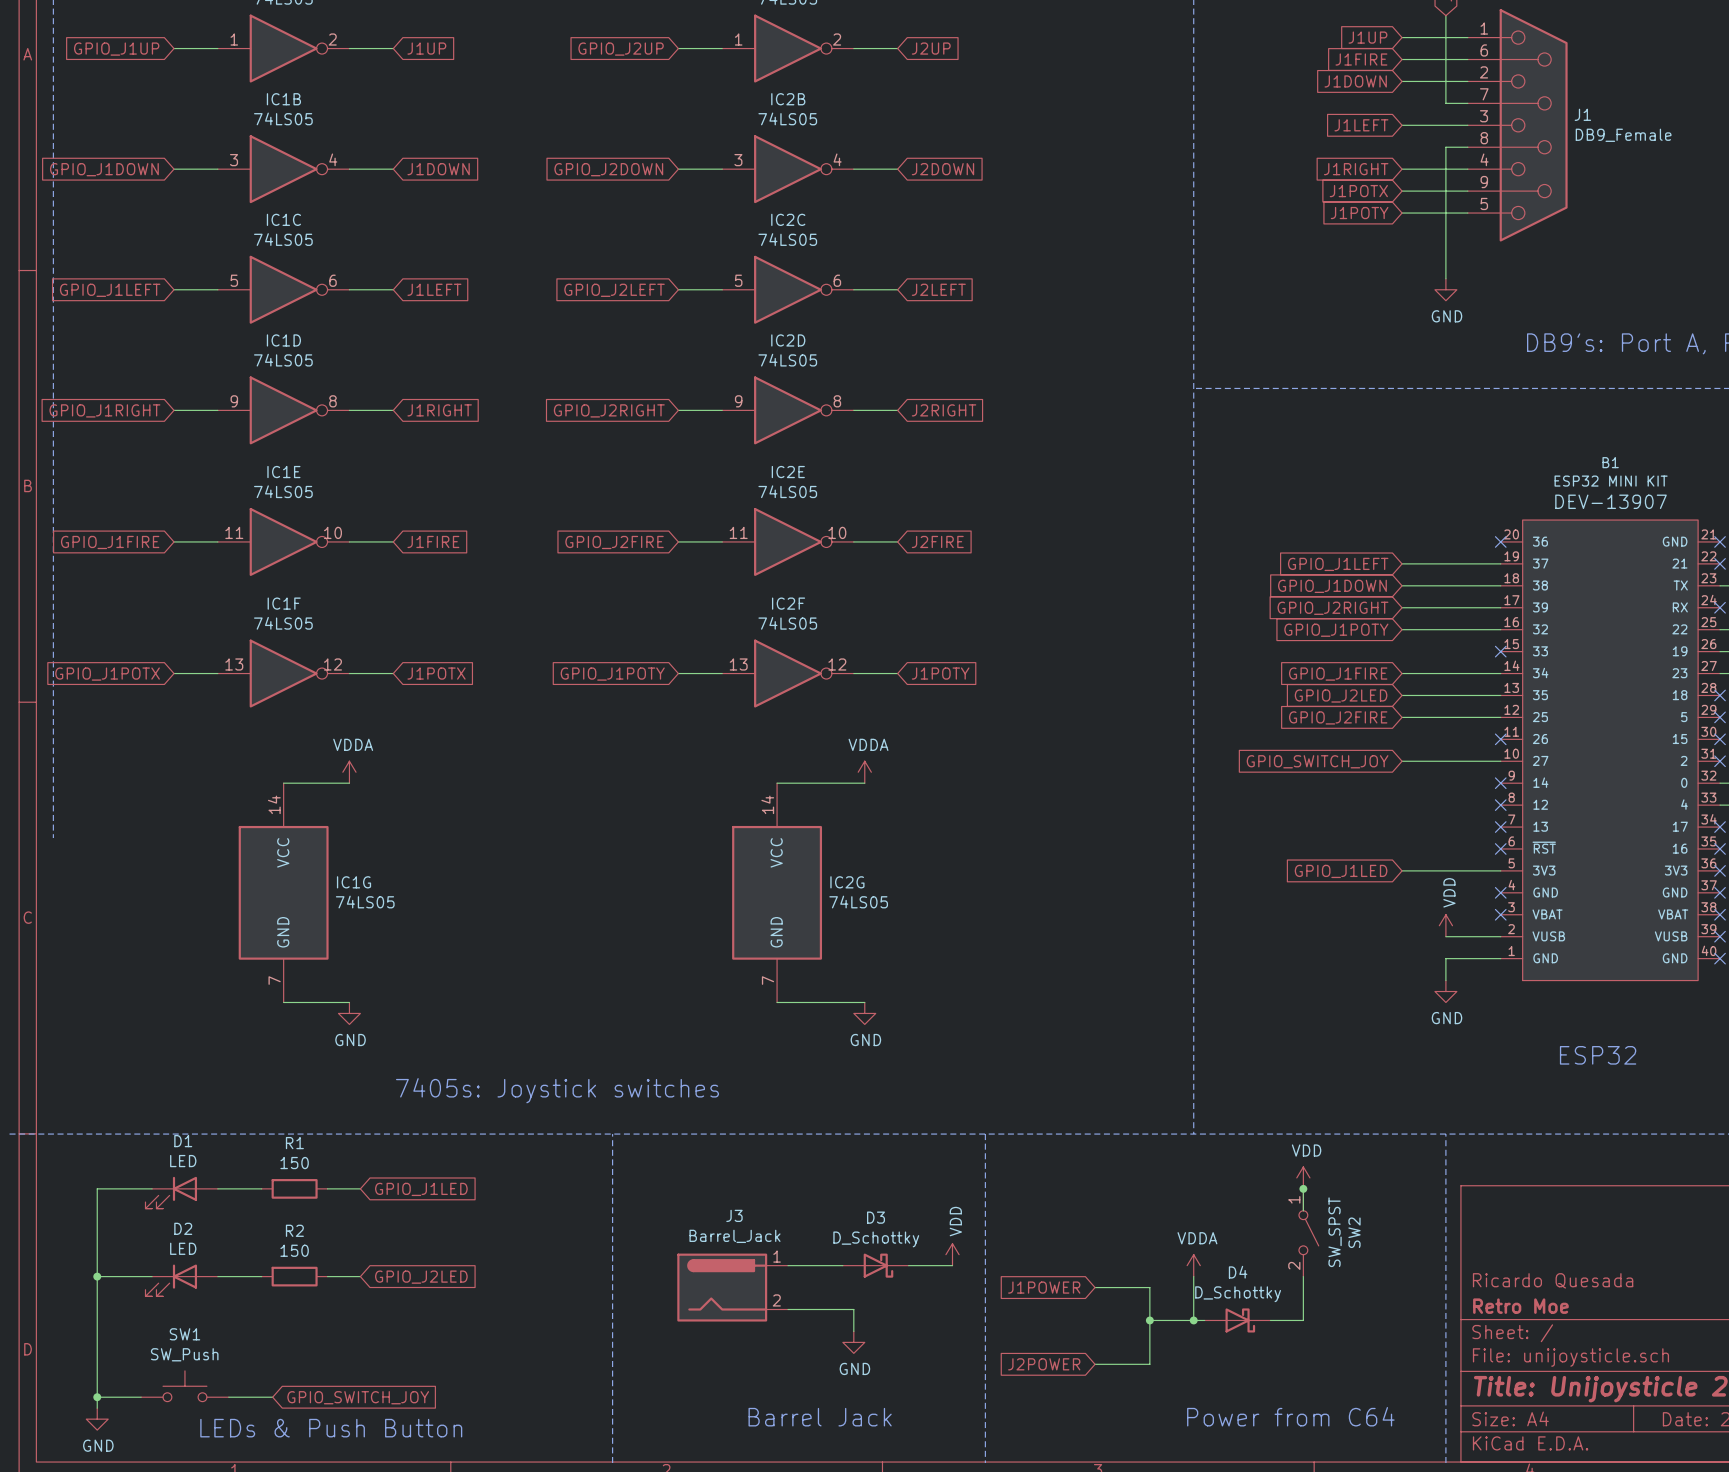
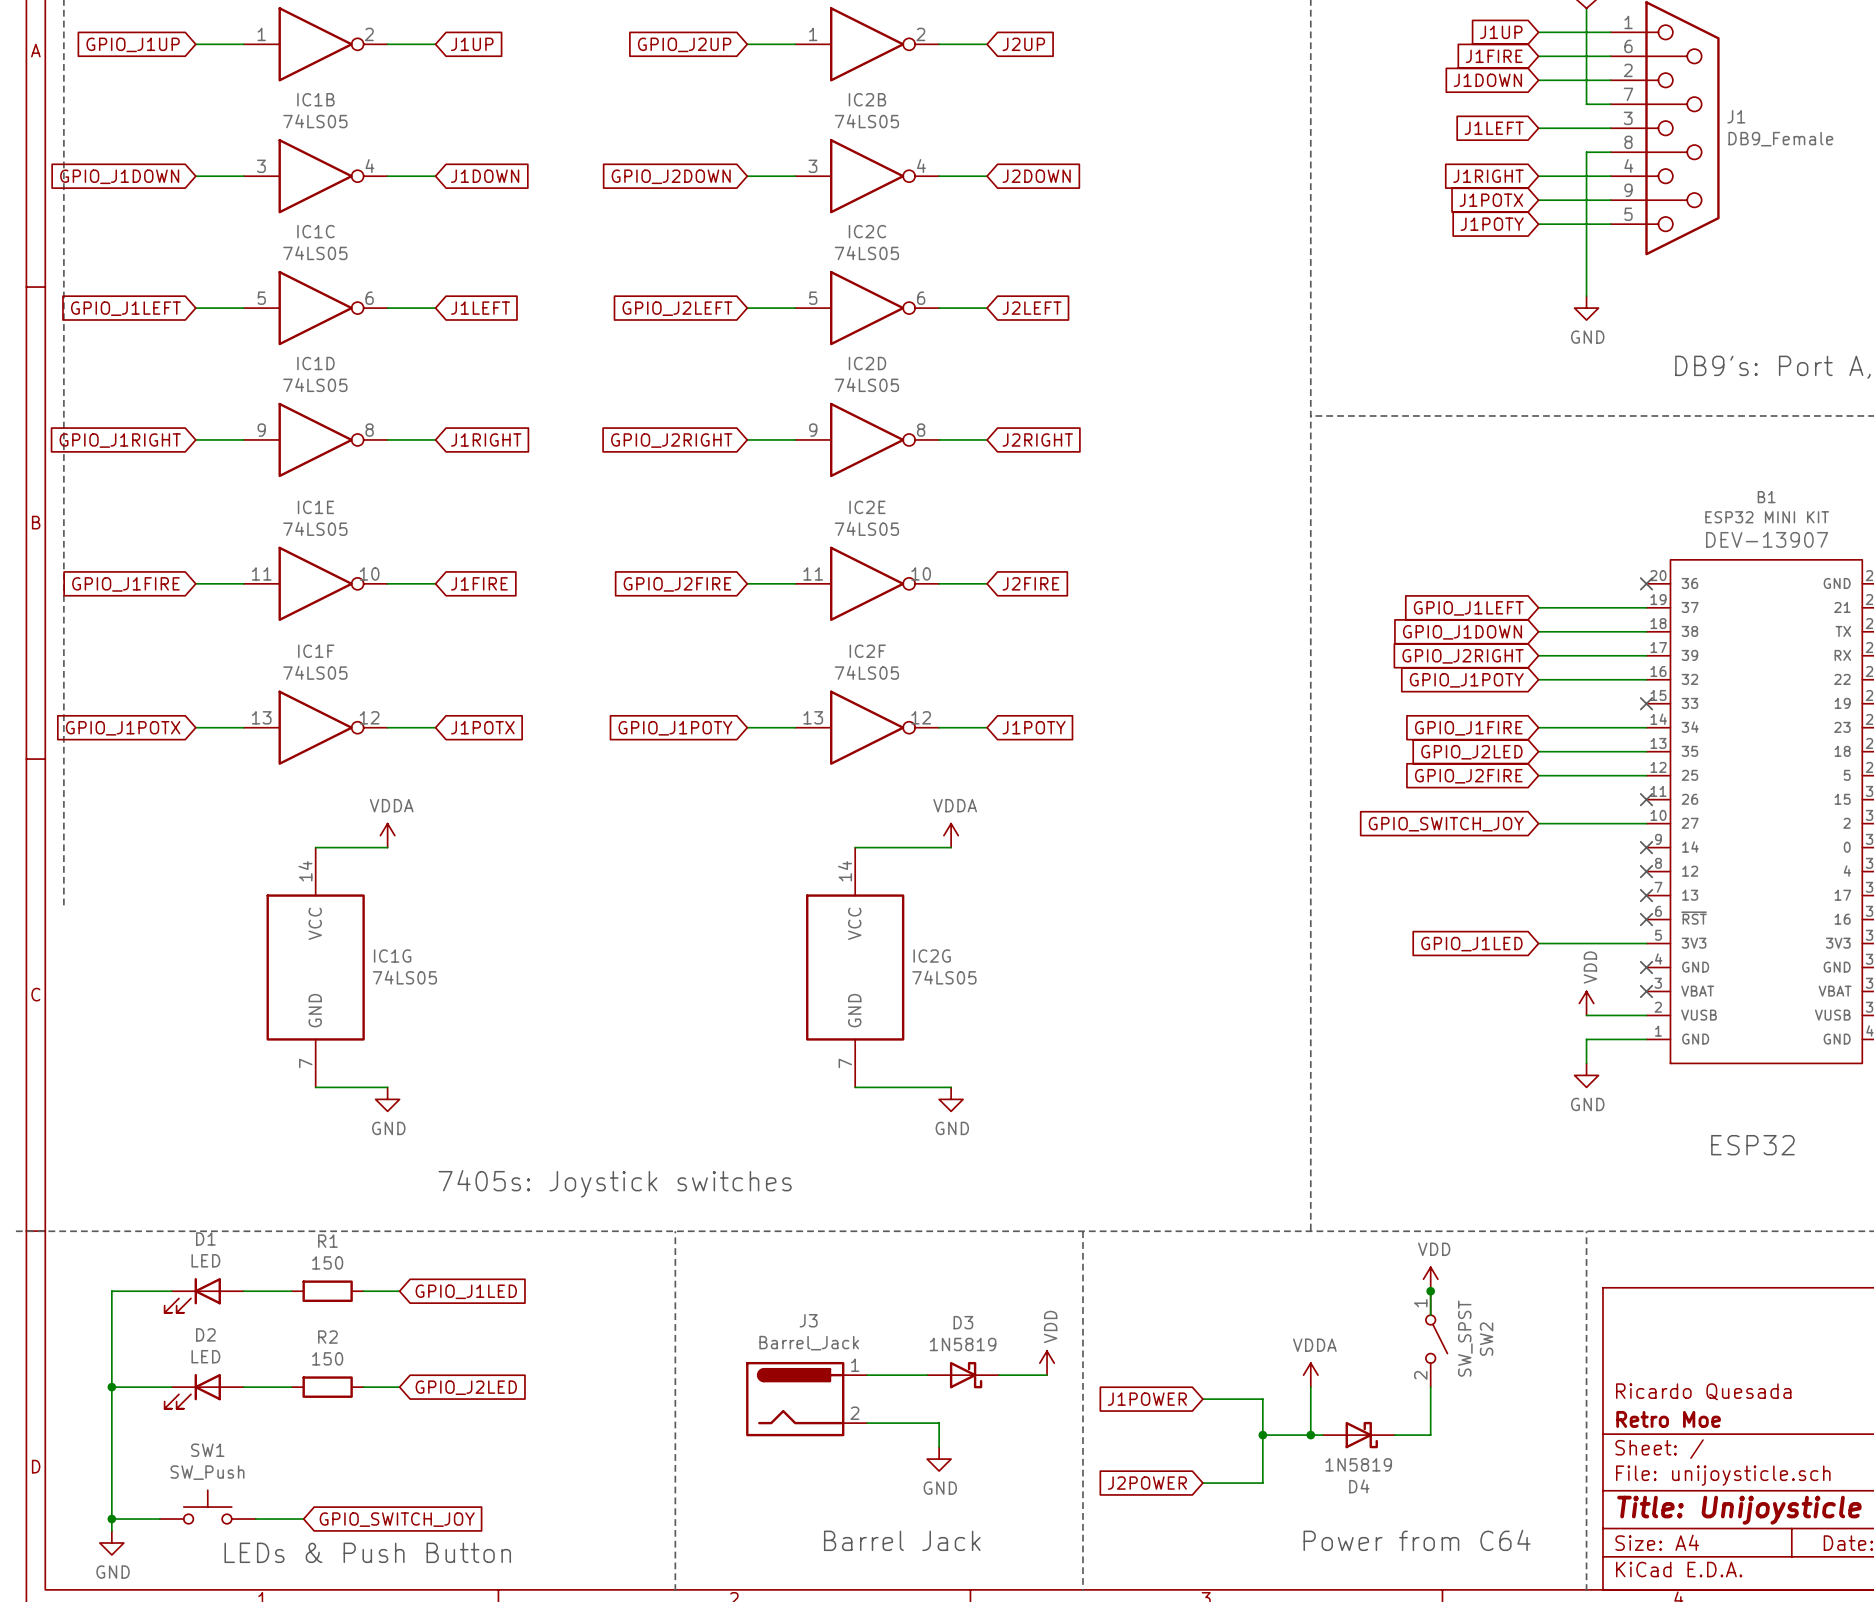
D3 value: D_Schottky (876, 1239) -> 1N5819 (963, 1344)
D4 name position: D4 (1238, 1272) -> D4 (1359, 1486)
D4 value: D_Schottky (1238, 1294) -> 1N5819 (1358, 1464)

